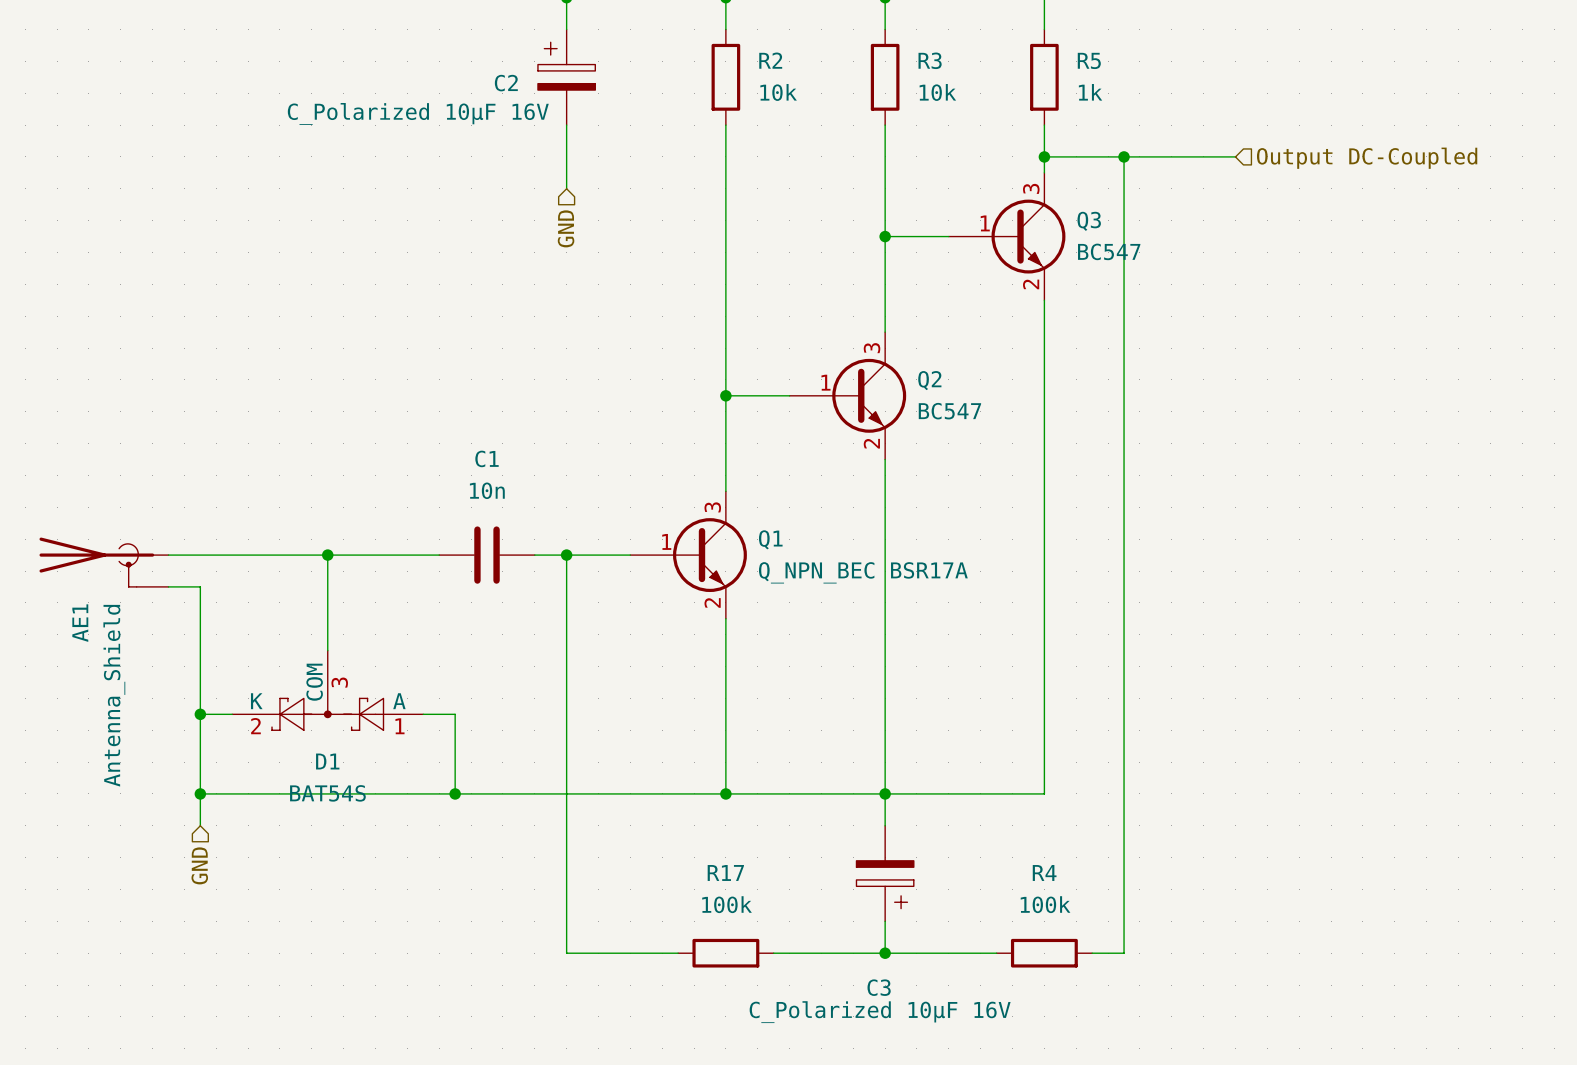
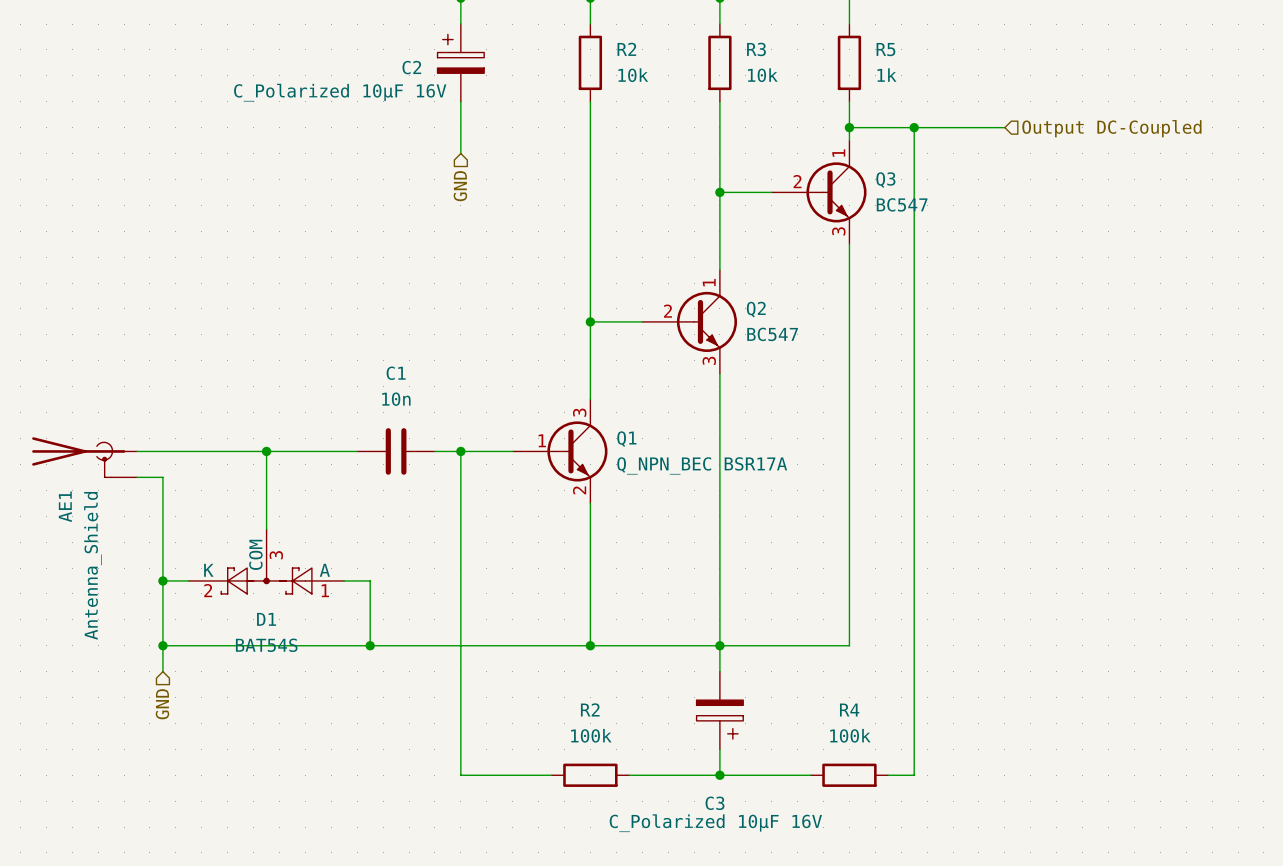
Q3 symbol: [948, 172, 1066, 301] -> [771, 140, 867, 245]
Q2 symbol: [789, 332, 907, 460] -> [642, 270, 738, 374]
R17 name: R17 (725, 872) -> R2 (590, 709)

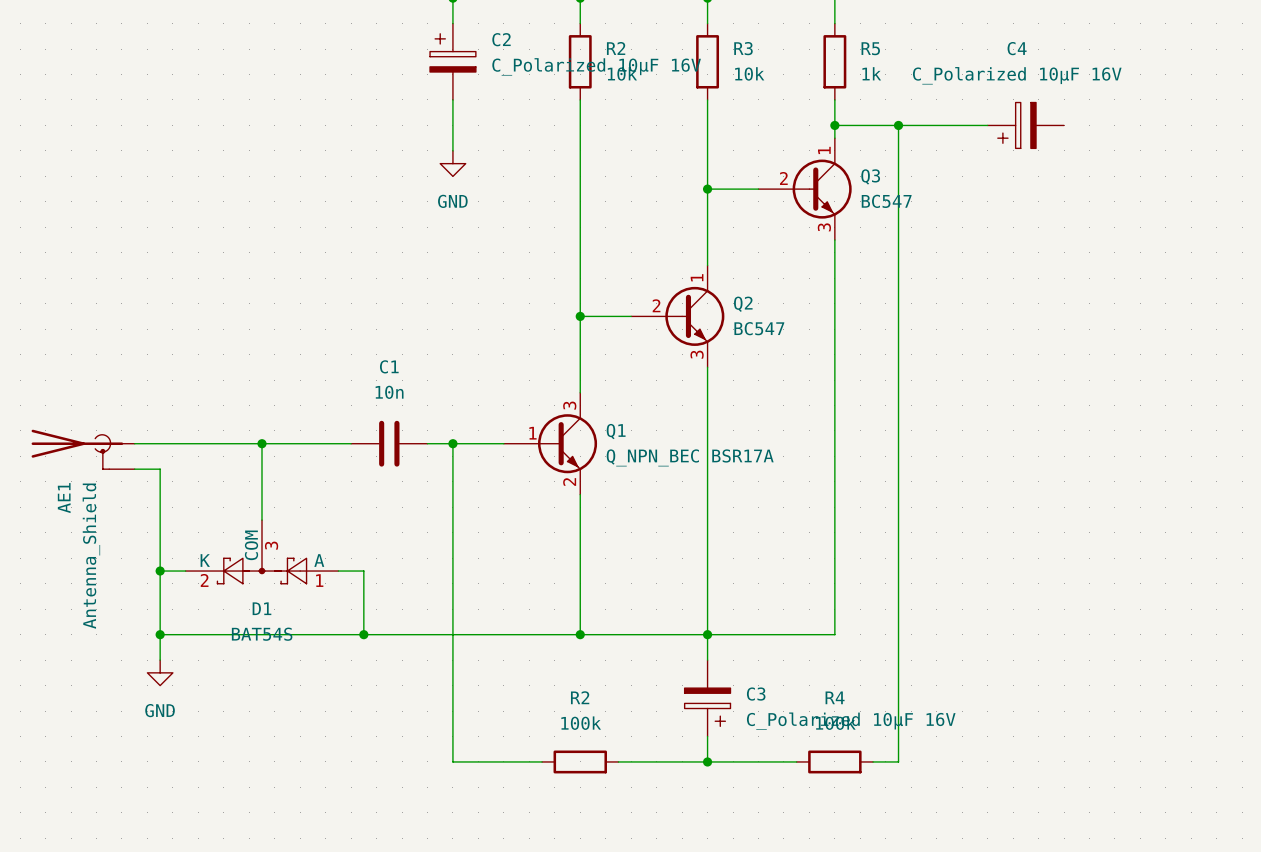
C2 name position: C2 (411, 67) -> C2 (501, 39)
C2 value position: C_Polarized 10µF 16V (340, 92) -> C_Polarized 10µF 16V (596, 66)
C4: none -> C_Polarized 10µF 16V (1025, 125)
hierarchical label: Output DC-Coupled (1111, 128) -> none
power symbol: none -> GND (452, 163)
hierarchical label: GND (460, 186) -> none
power symbol: none -> GND (160, 672)
hierarchical label: GND (162, 704) -> none
C3 name position: C3 (715, 803) -> C3 (756, 694)
C3 value position: C_Polarized 10µF 16V (715, 823) -> C_Polarized 10µF 16V (851, 721)

